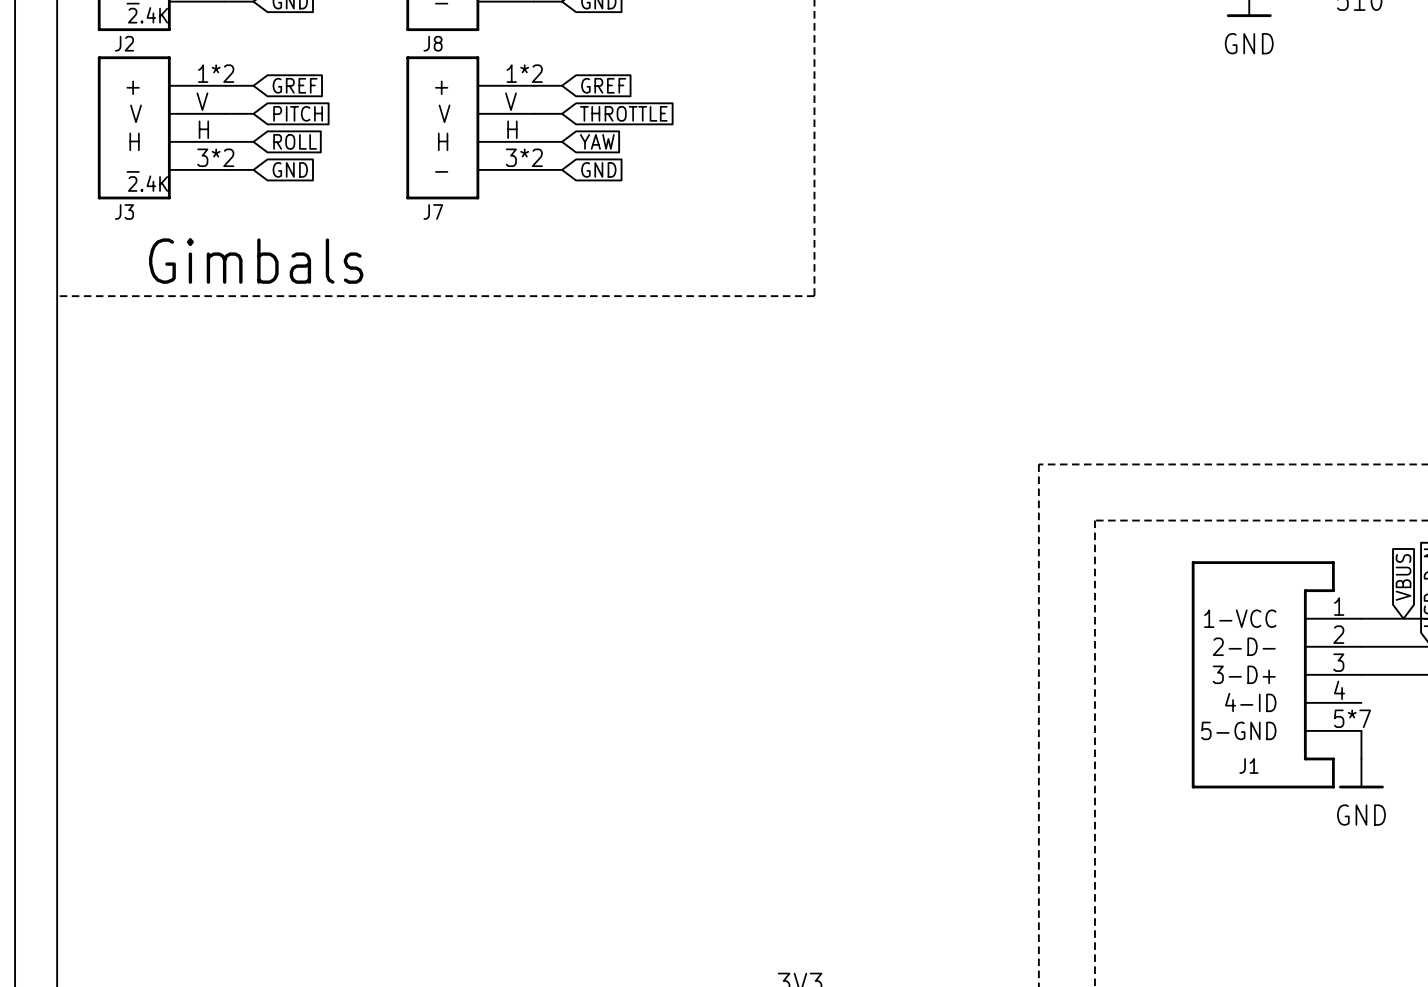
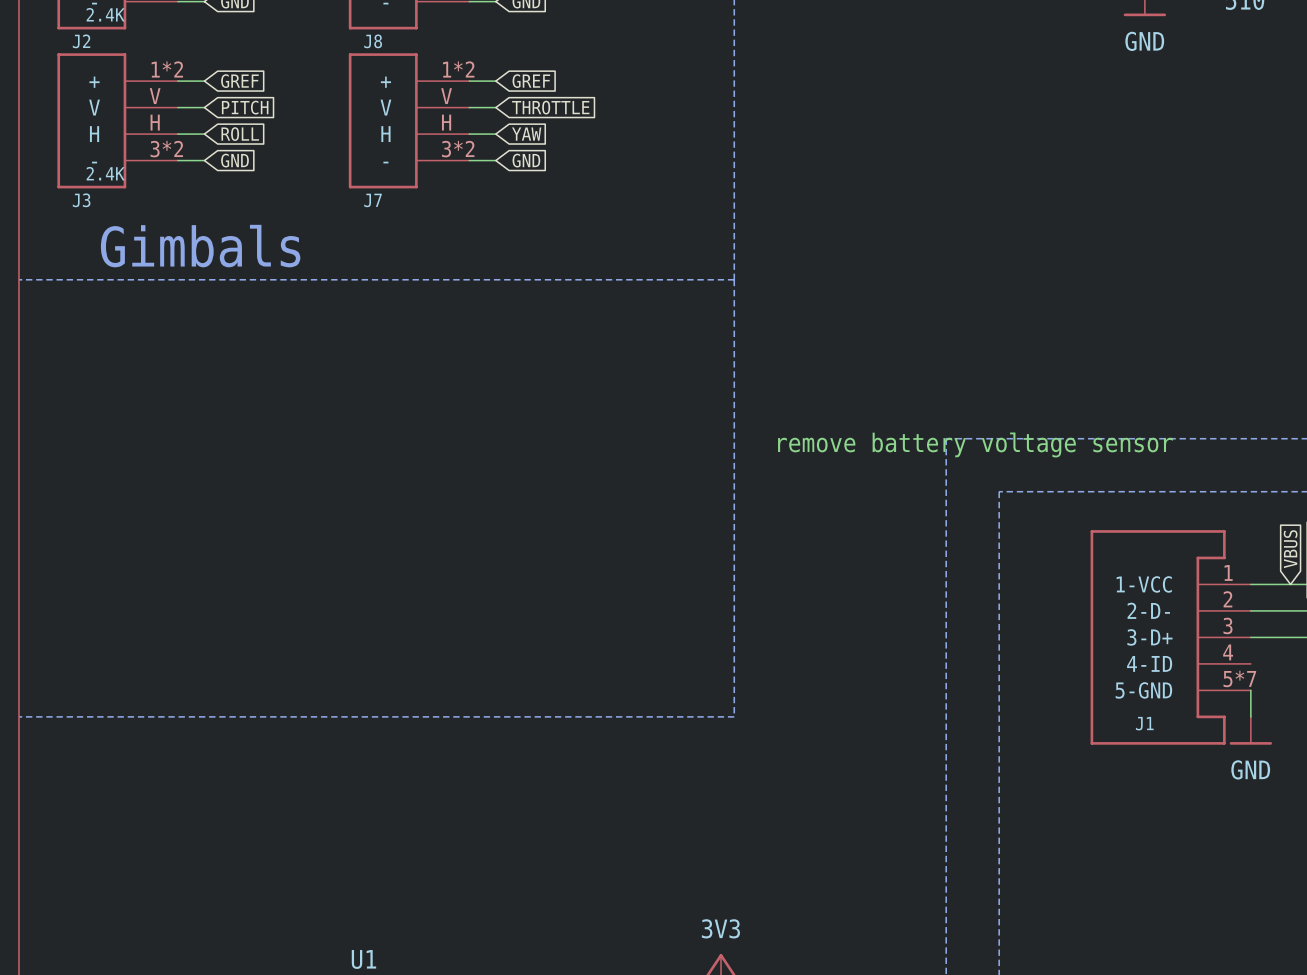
line: none -> (734, 279) (734, 716) (18, 716)
text: none -> remove battery voltage sensor (975, 444)

